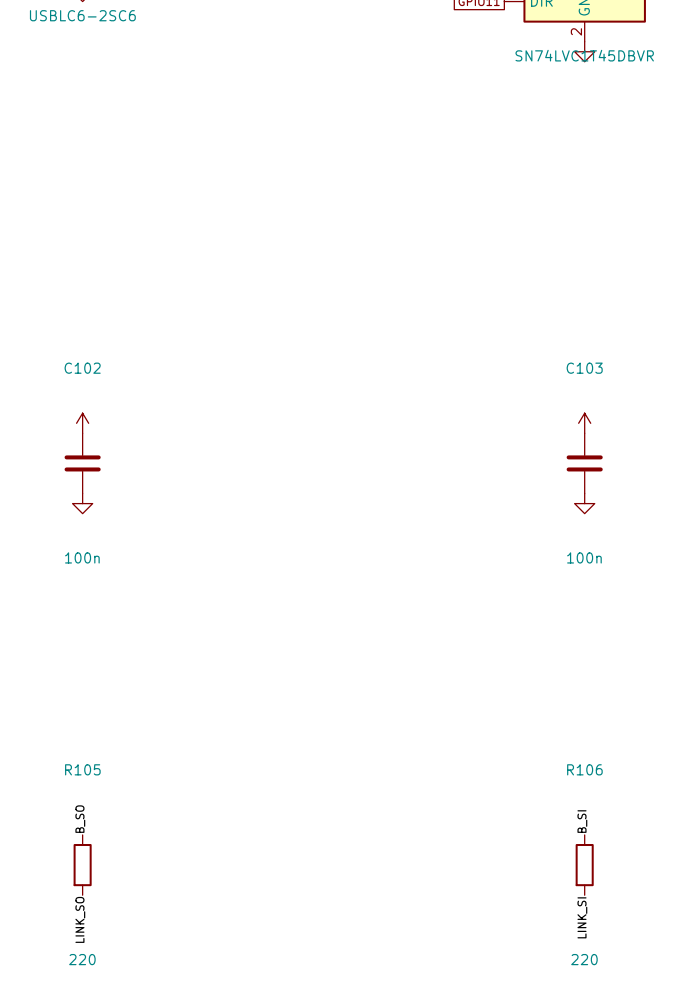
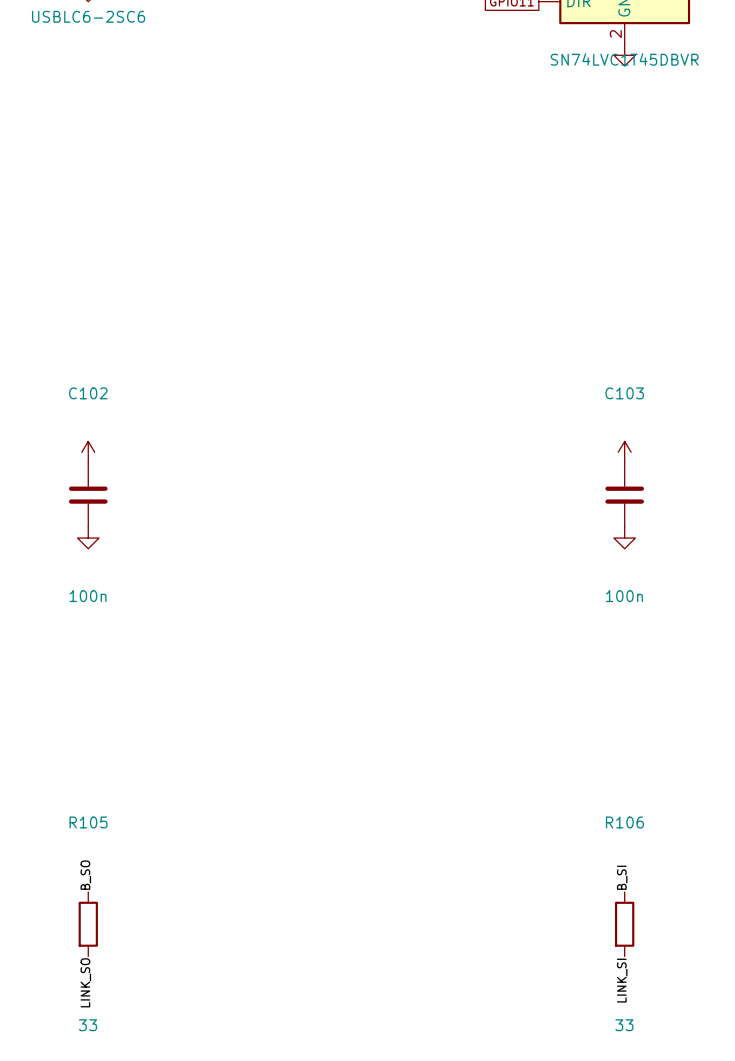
R105 value: 220 (82, 959) -> 33 (88, 1025)
R106 value: 220 (584, 959) -> 33 (624, 1025)

